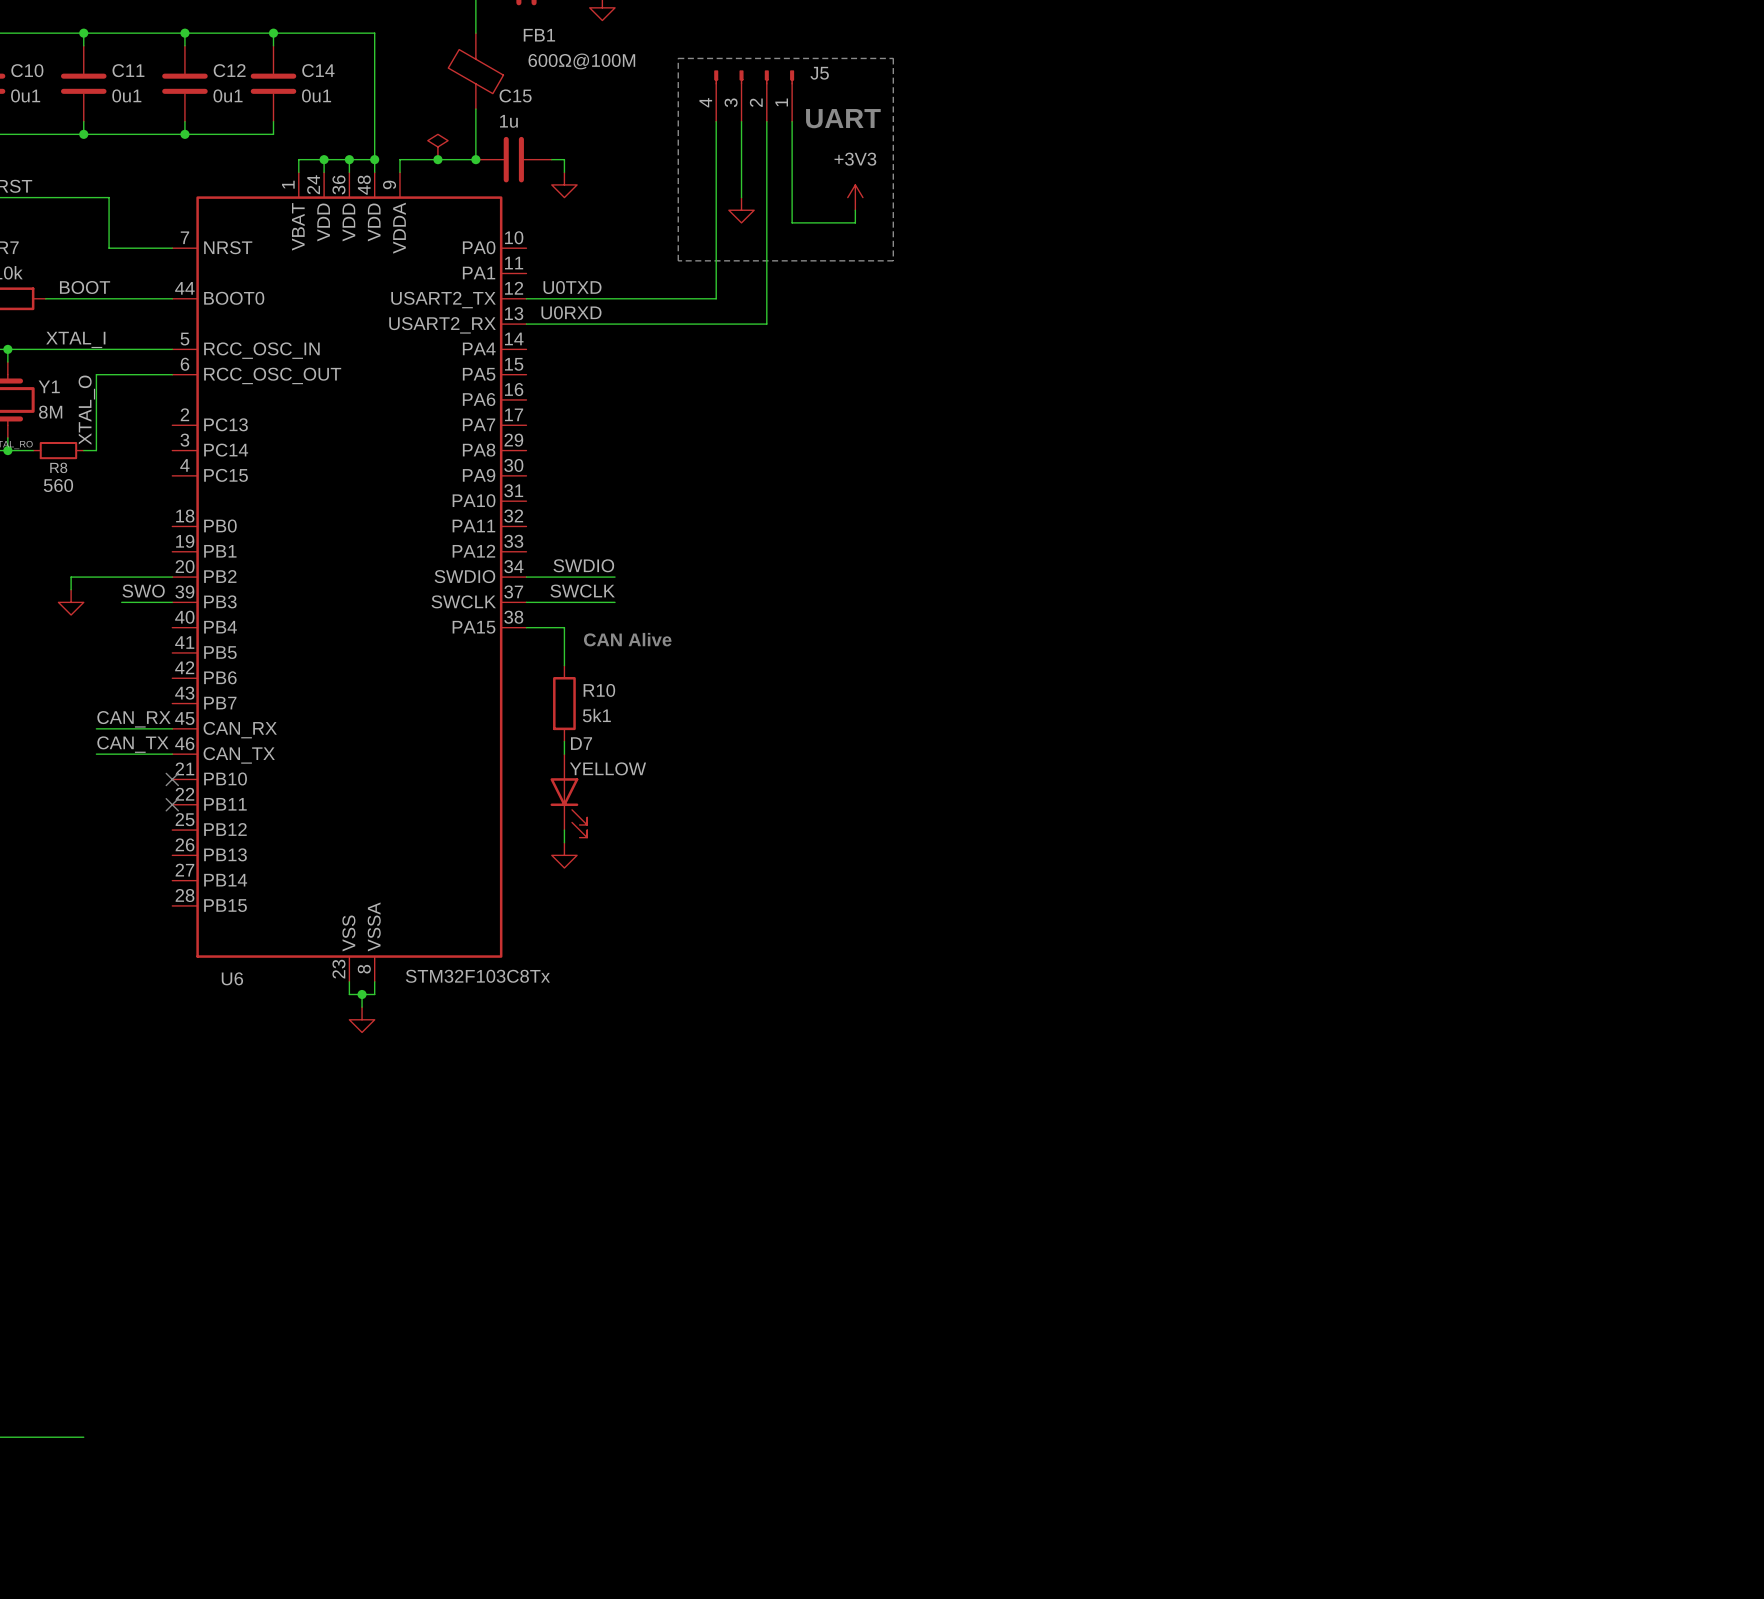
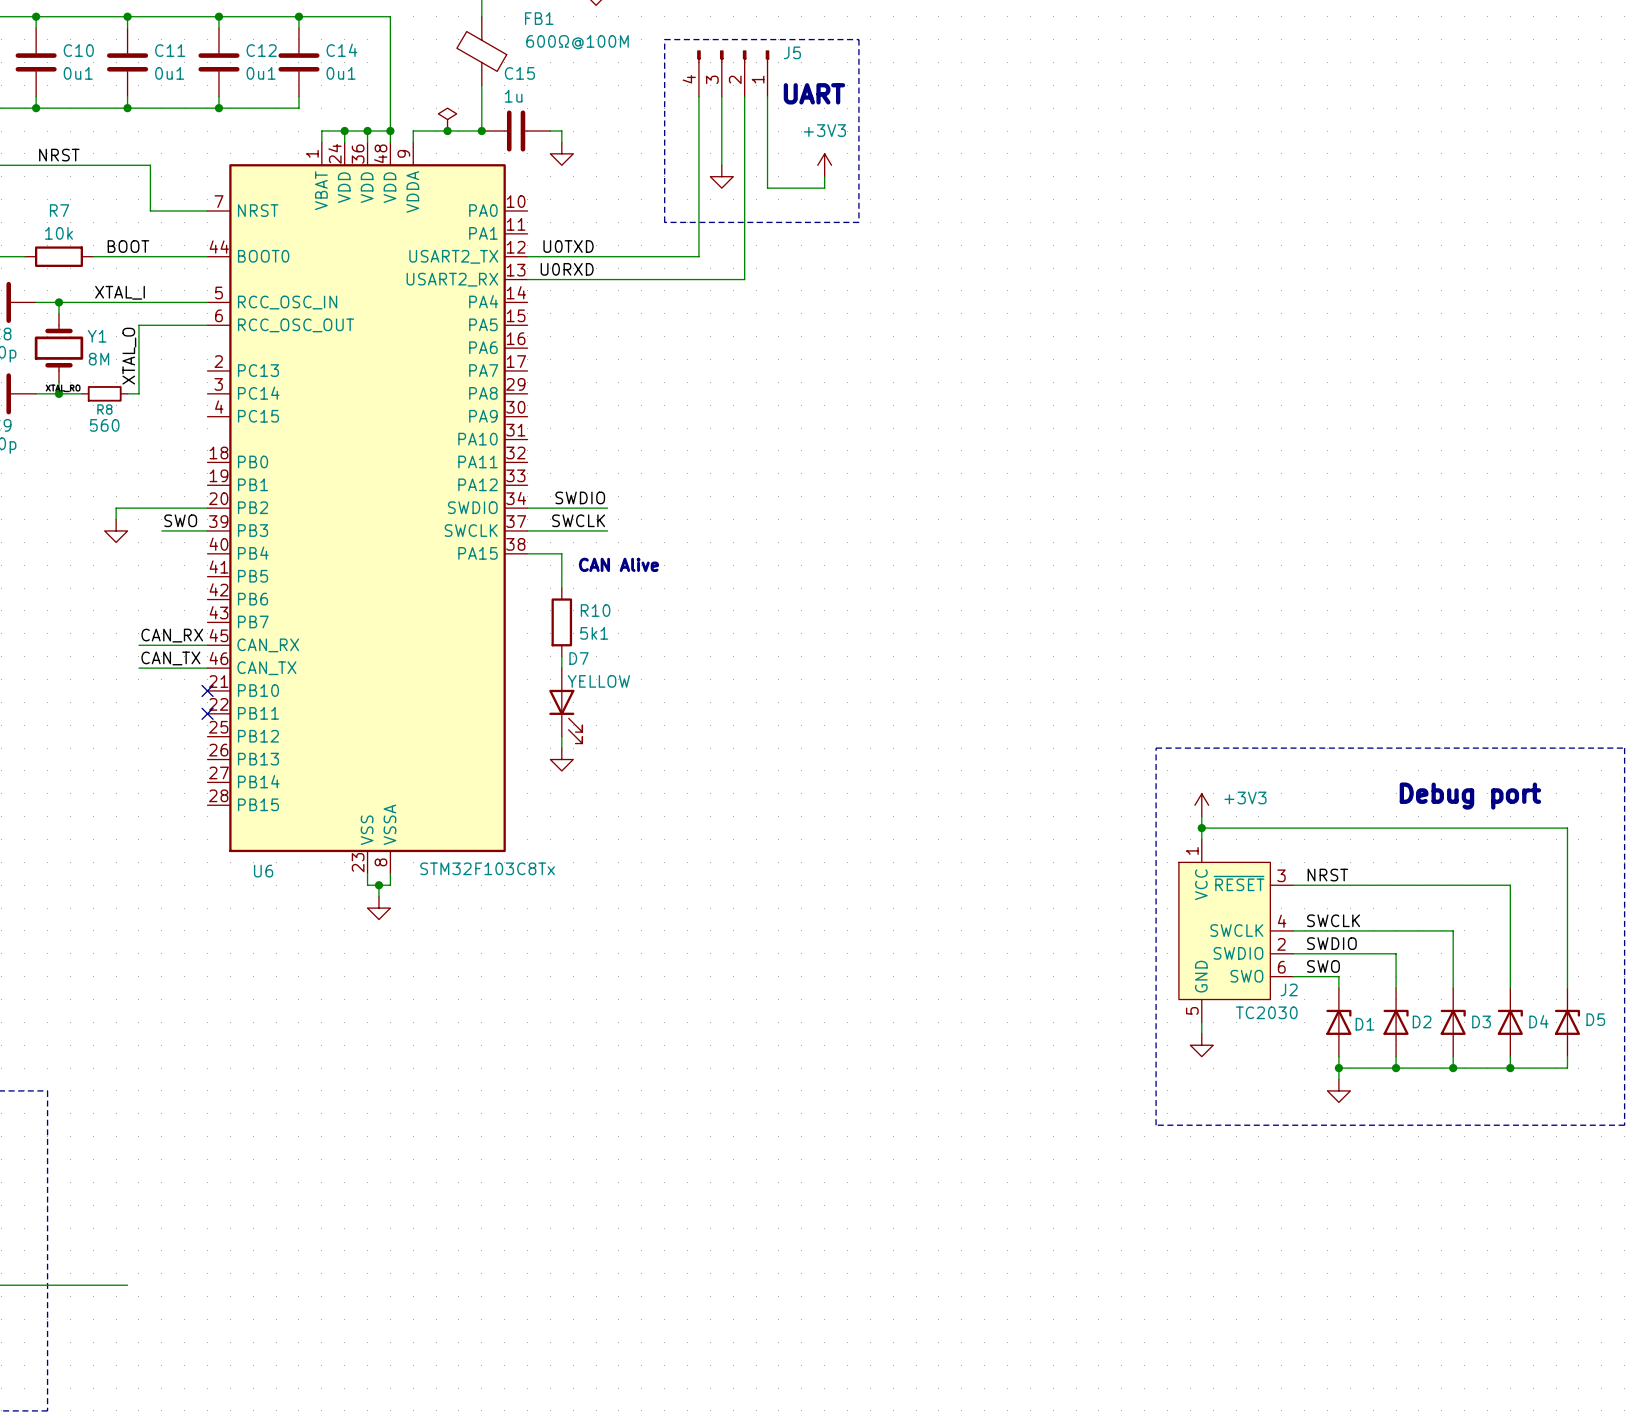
line: none -> (1156, 748) (1624, 748) (1624, 1125) (1156, 1125) (1156, 748)
text: none -> Debug port (1470, 796)
power symbol: none -> +3V3 (1201, 805)
wire: none -> (1201, 816) (1201, 839)
wire: none -> (1201, 828) (1567, 828) (1567, 988)
junction: none -> (1201, 828)
label: none -> NRST (1327, 875)
wire: none -> (1293, 885) (1510, 885) (1510, 988)
label: none -> SWCLK (1333, 920)
J2: none -> TC2030 (1236, 930)
wire: none -> (1293, 930) (1453, 930) (1453, 988)
label: none -> SWDIO (1331, 943)
wire: none -> (1293, 953) (1396, 953) (1396, 988)
label: none -> SWO (1323, 966)
wire: none -> (1293, 976) (1338, 976) (1338, 988)
wire: none -> (1201, 1022) (1201, 1033)
D1: none -> (1338, 1022)
D2: none -> (1396, 1022)
D3: none -> (1453, 1022)
D4: none -> (1510, 1022)
D5: none -> (1567, 1022)
power symbol: none -> (1201, 1045)
wire: none -> (1338, 1056) (1338, 1079)
wire: none -> (1396, 1056) (1396, 1068)
wire: none -> (1453, 1056) (1453, 1068)
wire: none -> (1510, 1056) (1510, 1068)
wire: none -> (1567, 1056) (1567, 1068) (1338, 1068)
junction: none -> (1338, 1068)
junction: none -> (1396, 1068)
junction: none -> (1453, 1068)
junction: none -> (1510, 1068)
power symbol: none -> (1338, 1090)

